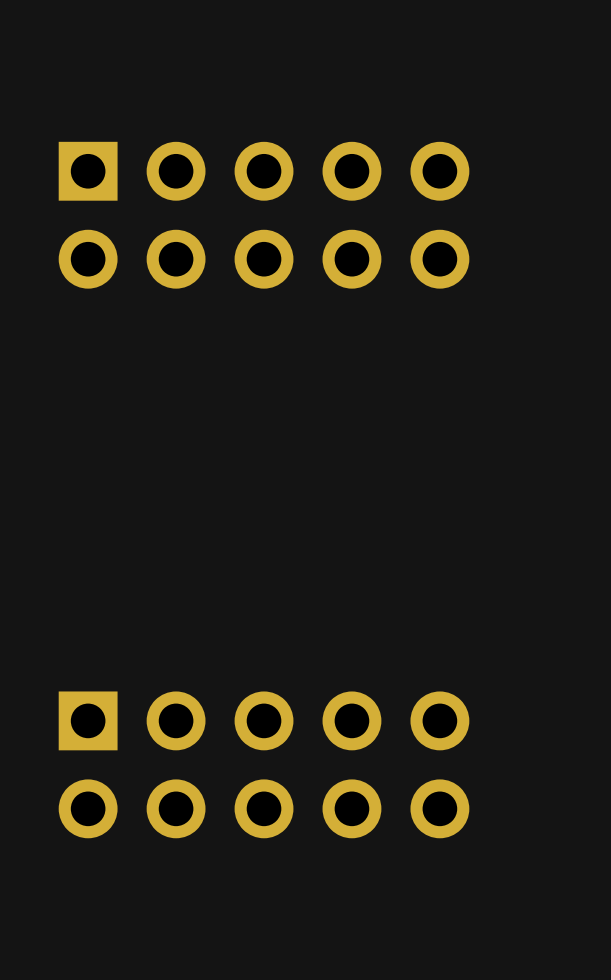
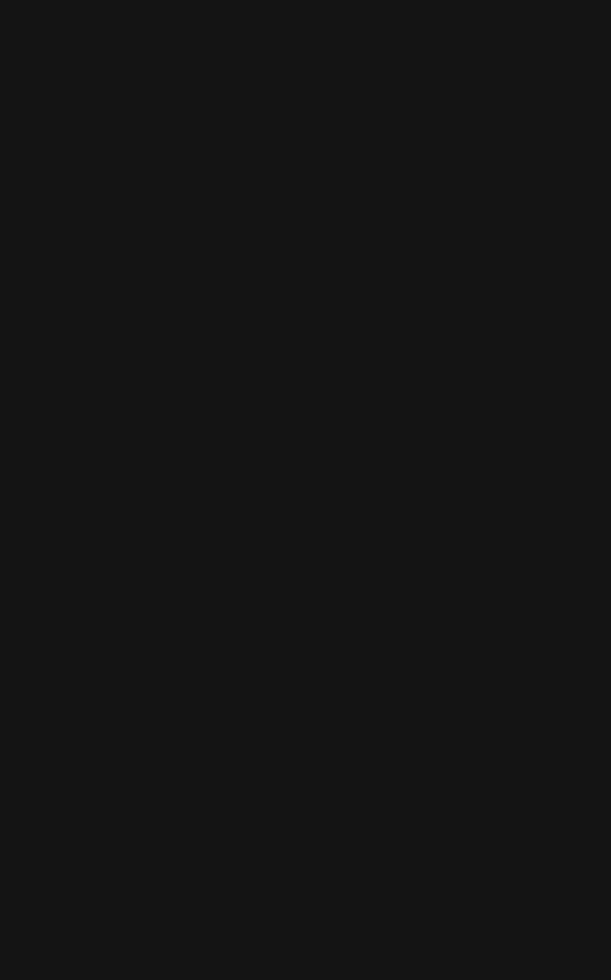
part: (264, 215) -> none
part: (264, 764) -> none

